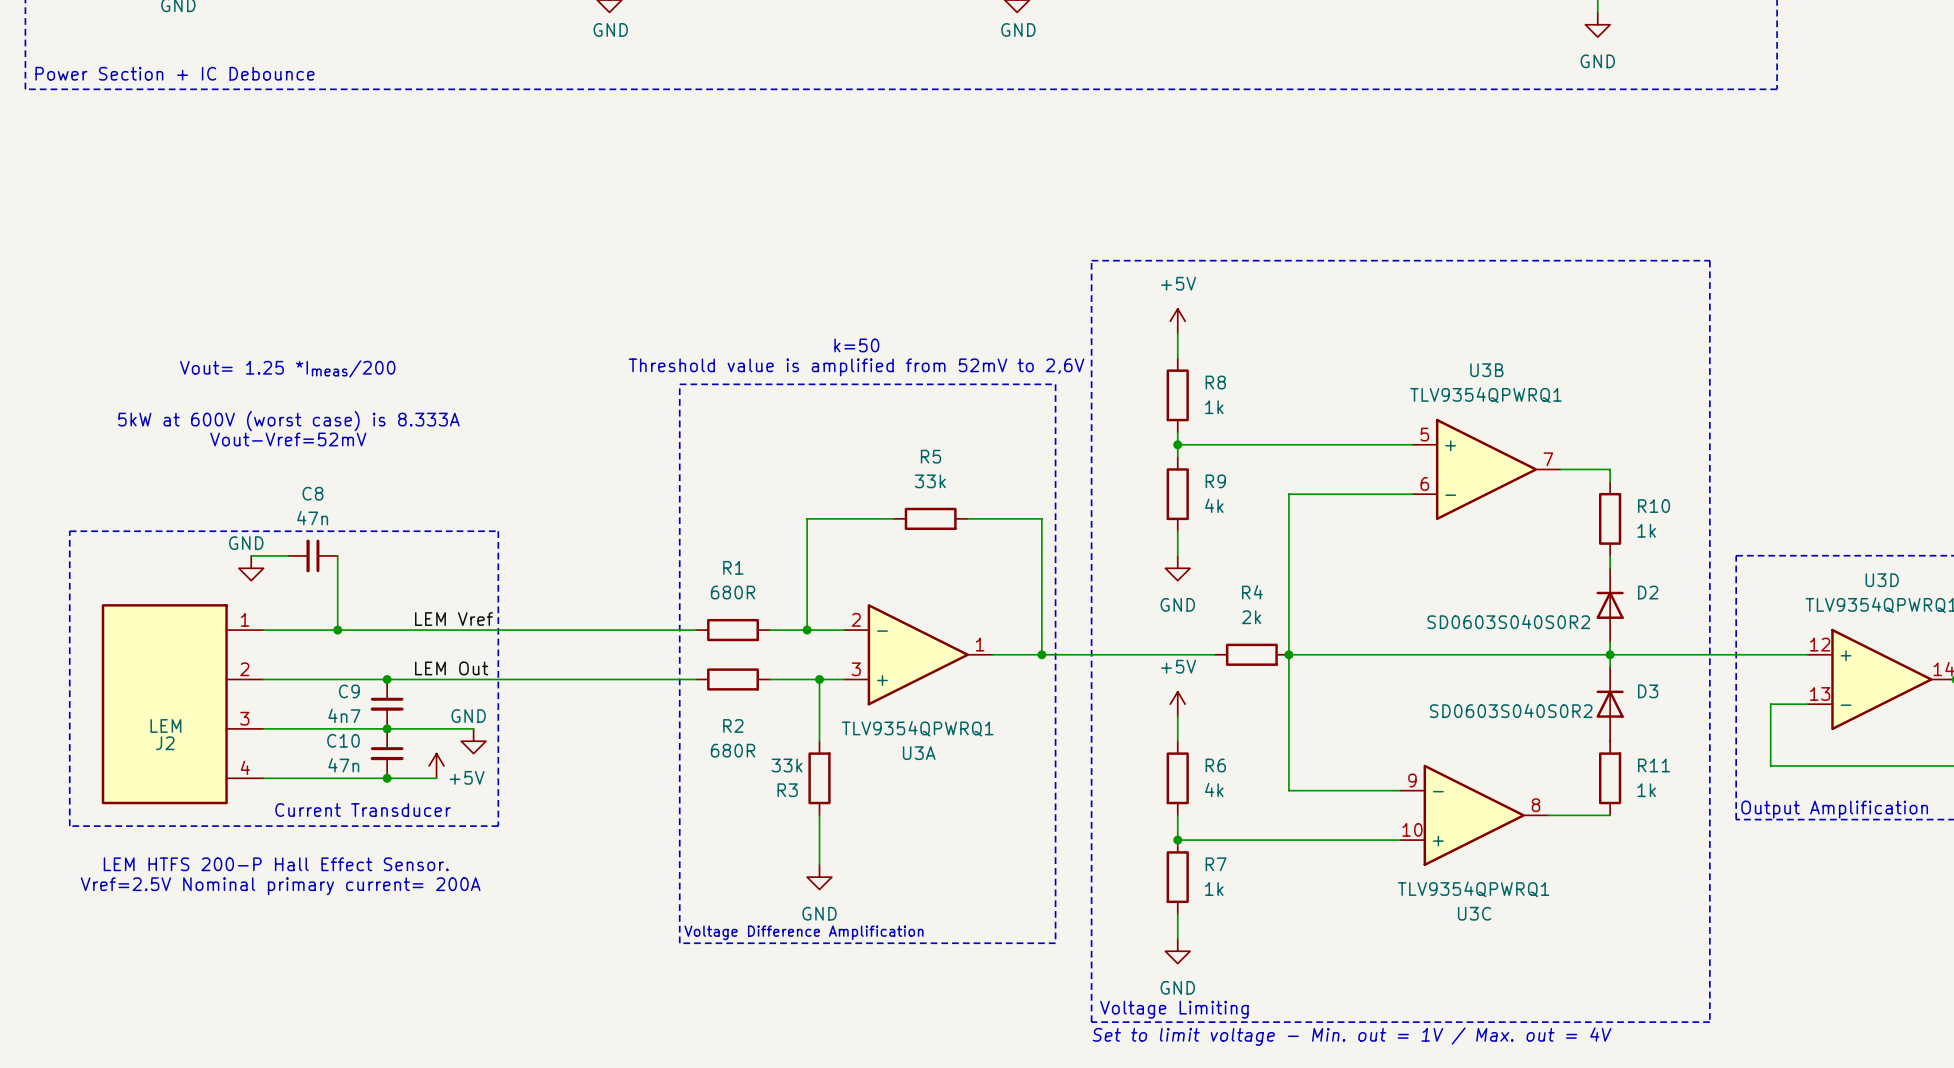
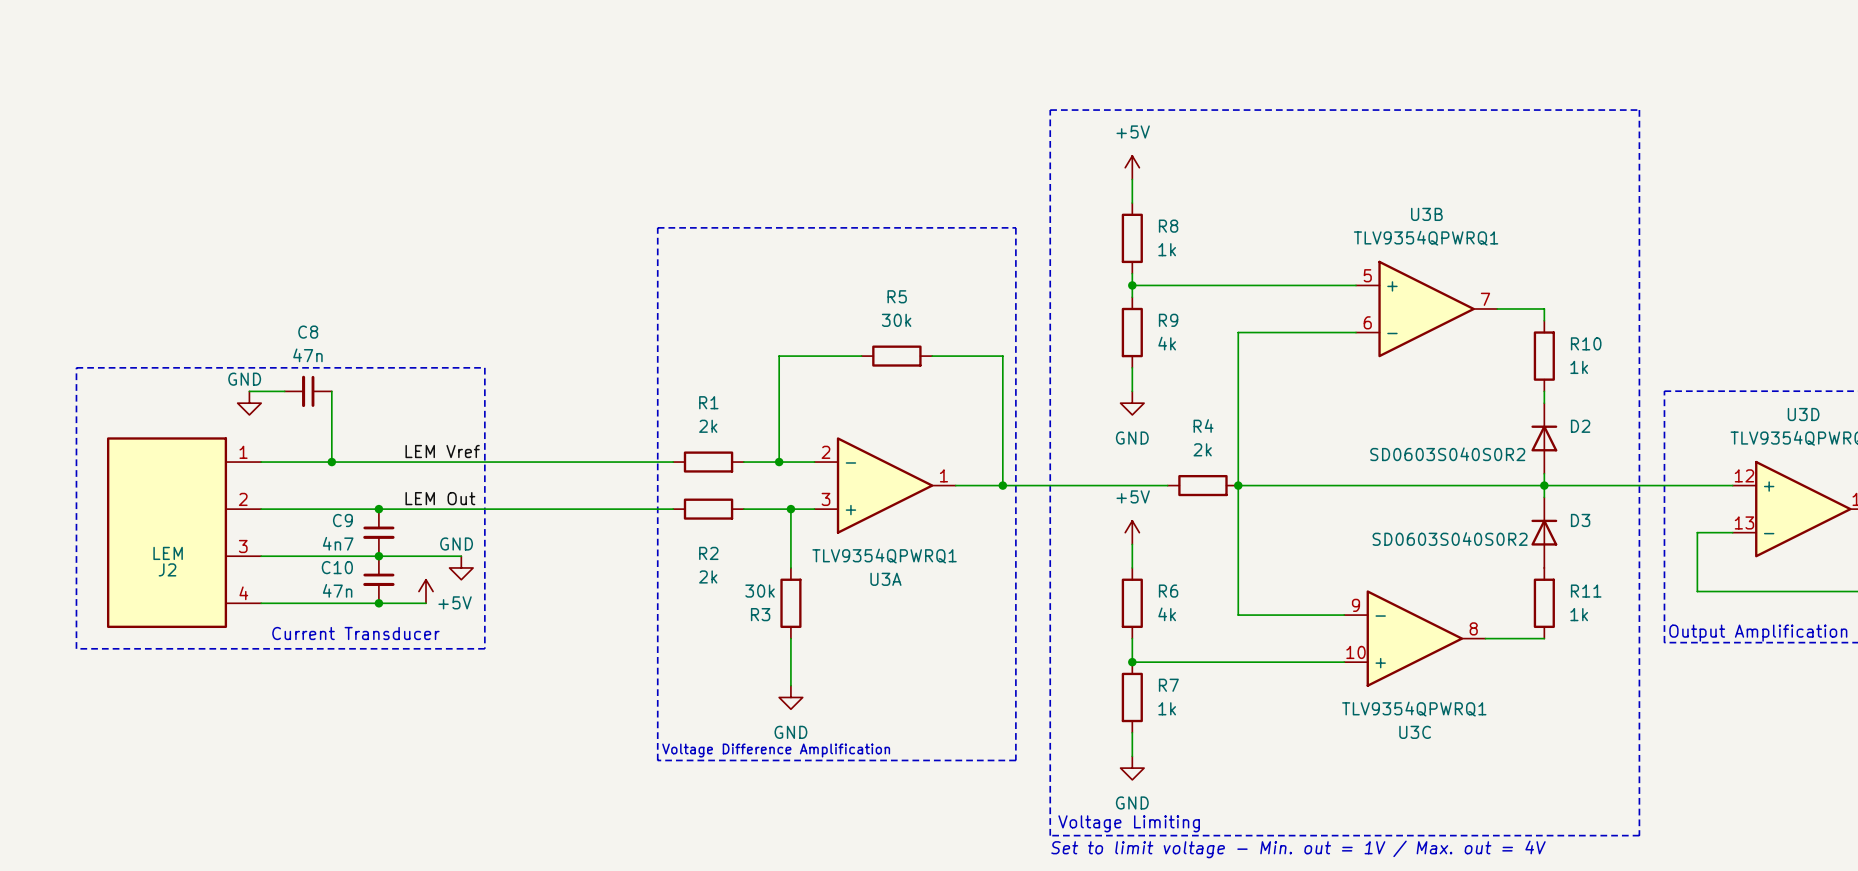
text: k=50 (856, 345) -> none
text: Threshold value is amplified from 52mV to 2,6V (856, 367) -> none
text: Vout= 1.25 *Imeas/200 (287, 368) -> none
text: 5kW at 600V (worst case) is 8.333A (288, 421) -> none
text: Vout-Vref=52mV (288, 439) -> none
R5 value: 33k (930, 481) -> 30k (896, 320)
R1 value: 680R (733, 592) -> 2k (708, 426)
R2 value: 680R (733, 750) -> 2k (708, 576)
R3 value: 33k (787, 765) -> 30k (760, 591)
text: LEM HTFS 200-P Hall Effect Sensor. (276, 864) -> none
text: Vref=2.5V Nominal primary current= 200A (280, 886) -> none

